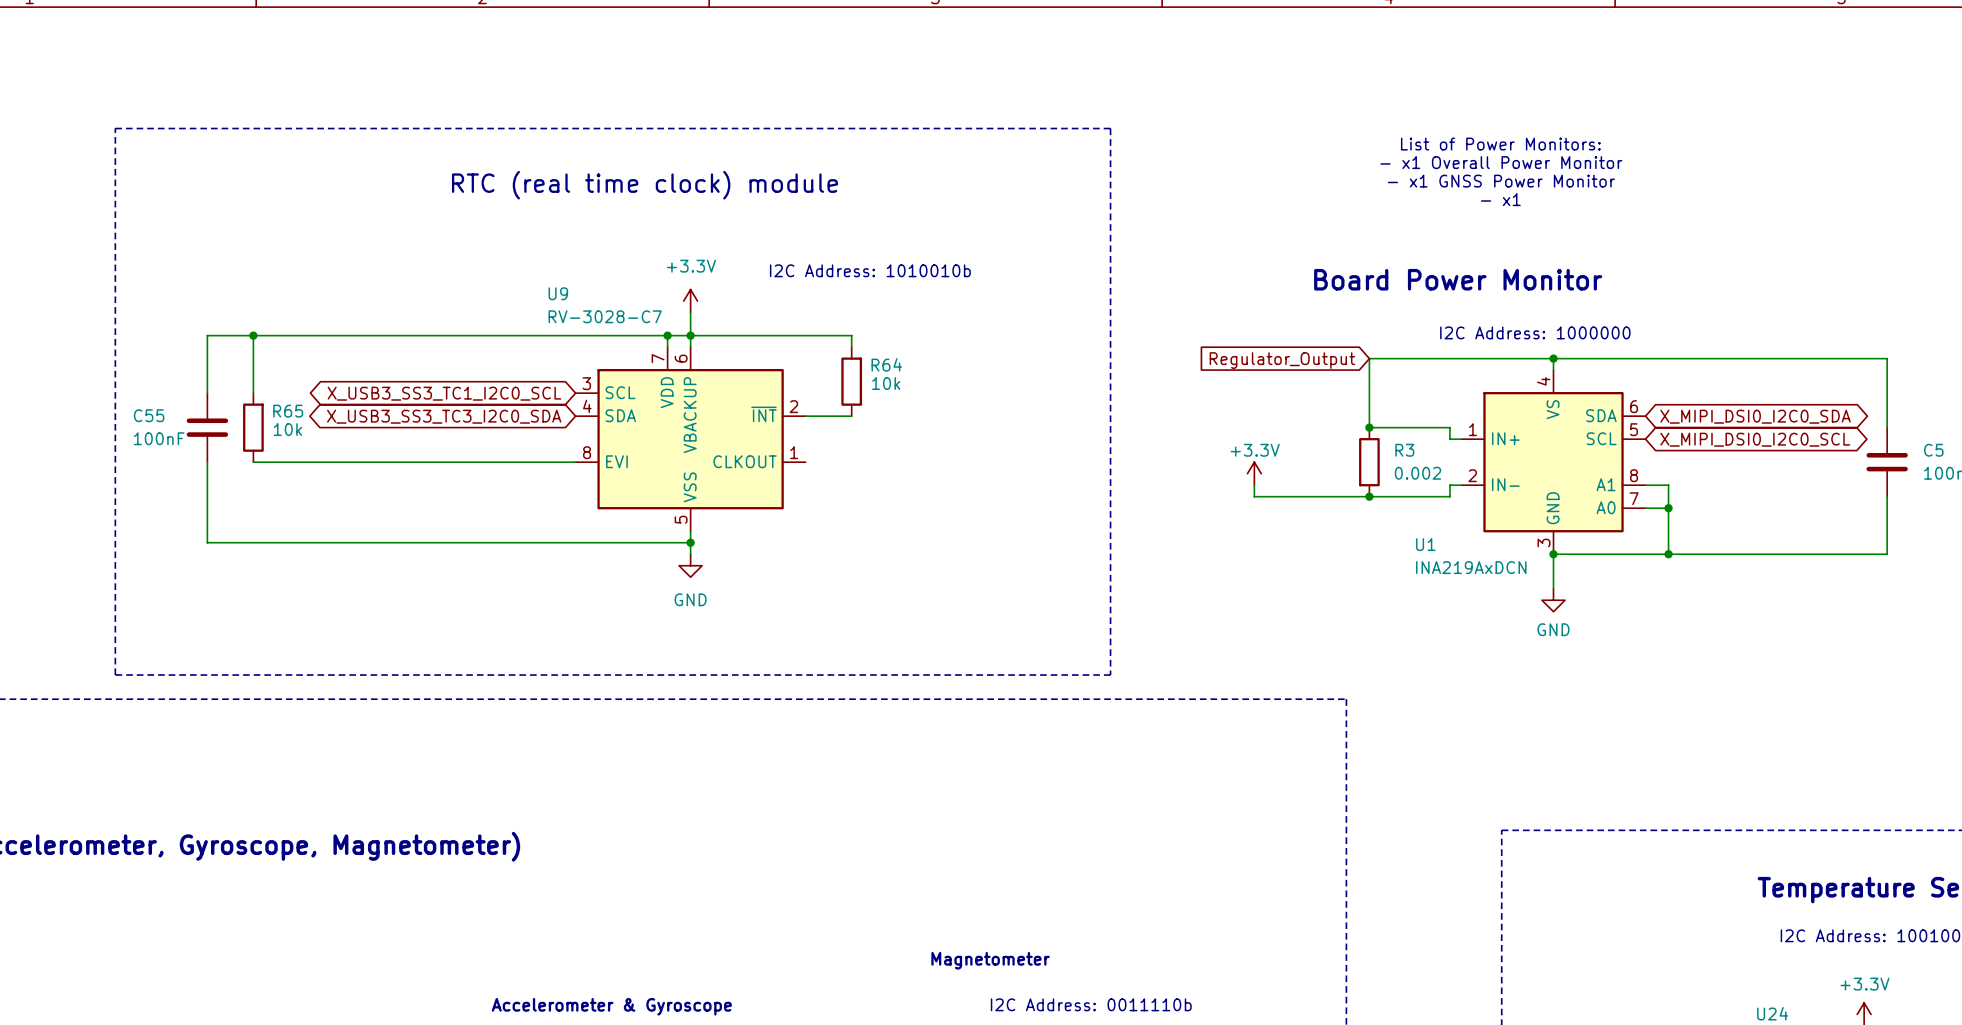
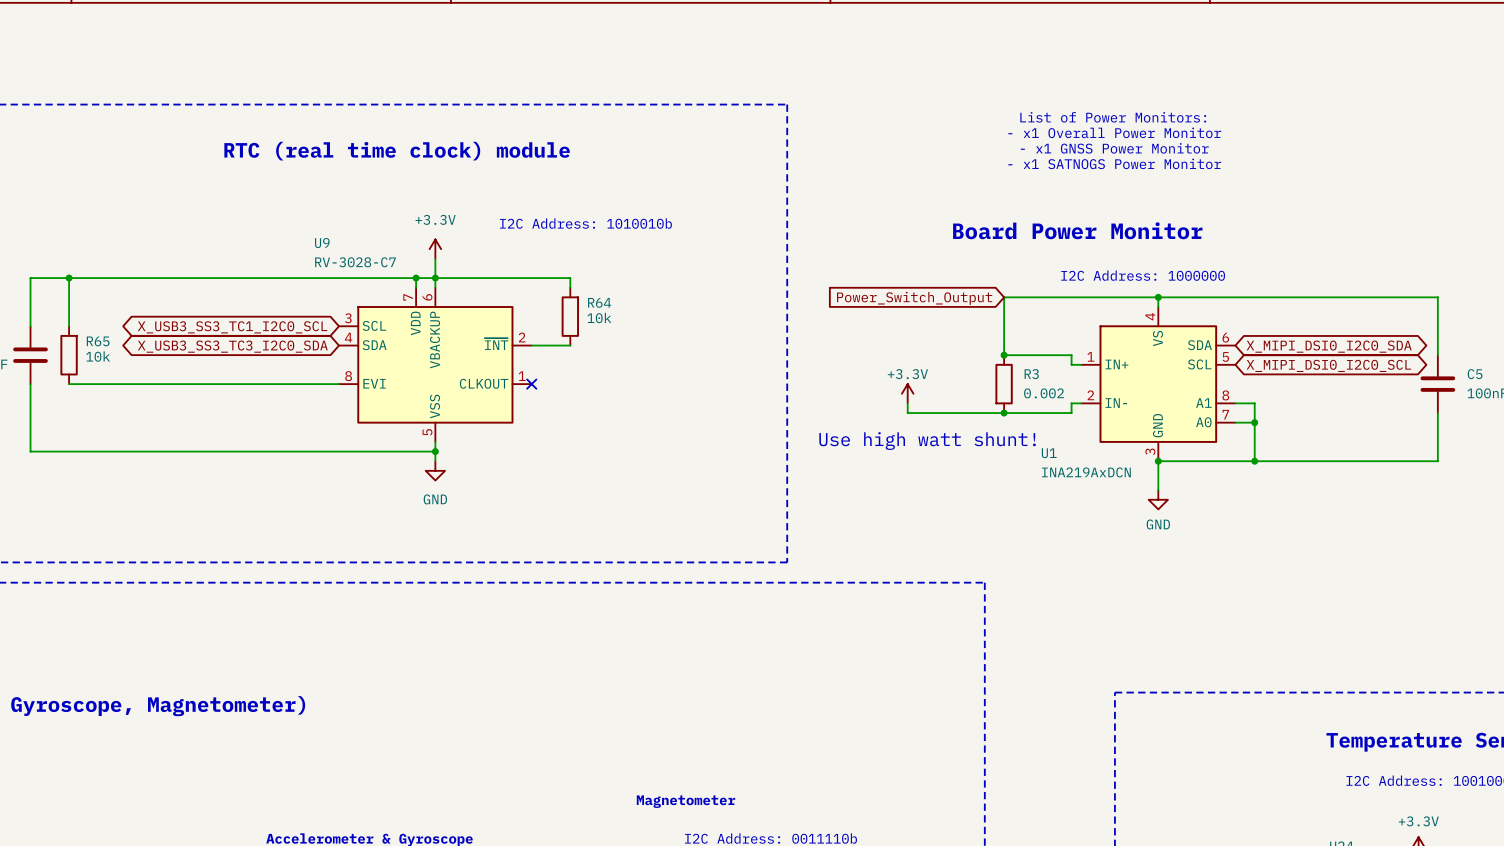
text: - x1 (1500, 199) -> - x1 SATNOGS Power Monitor (1114, 163)
global label: Regulator_Output (1282, 360) -> Power_Switch_Output (914, 298)
no-connect mark: none -> (531, 384)
text: none -> Use high watt shunt! (927, 441)

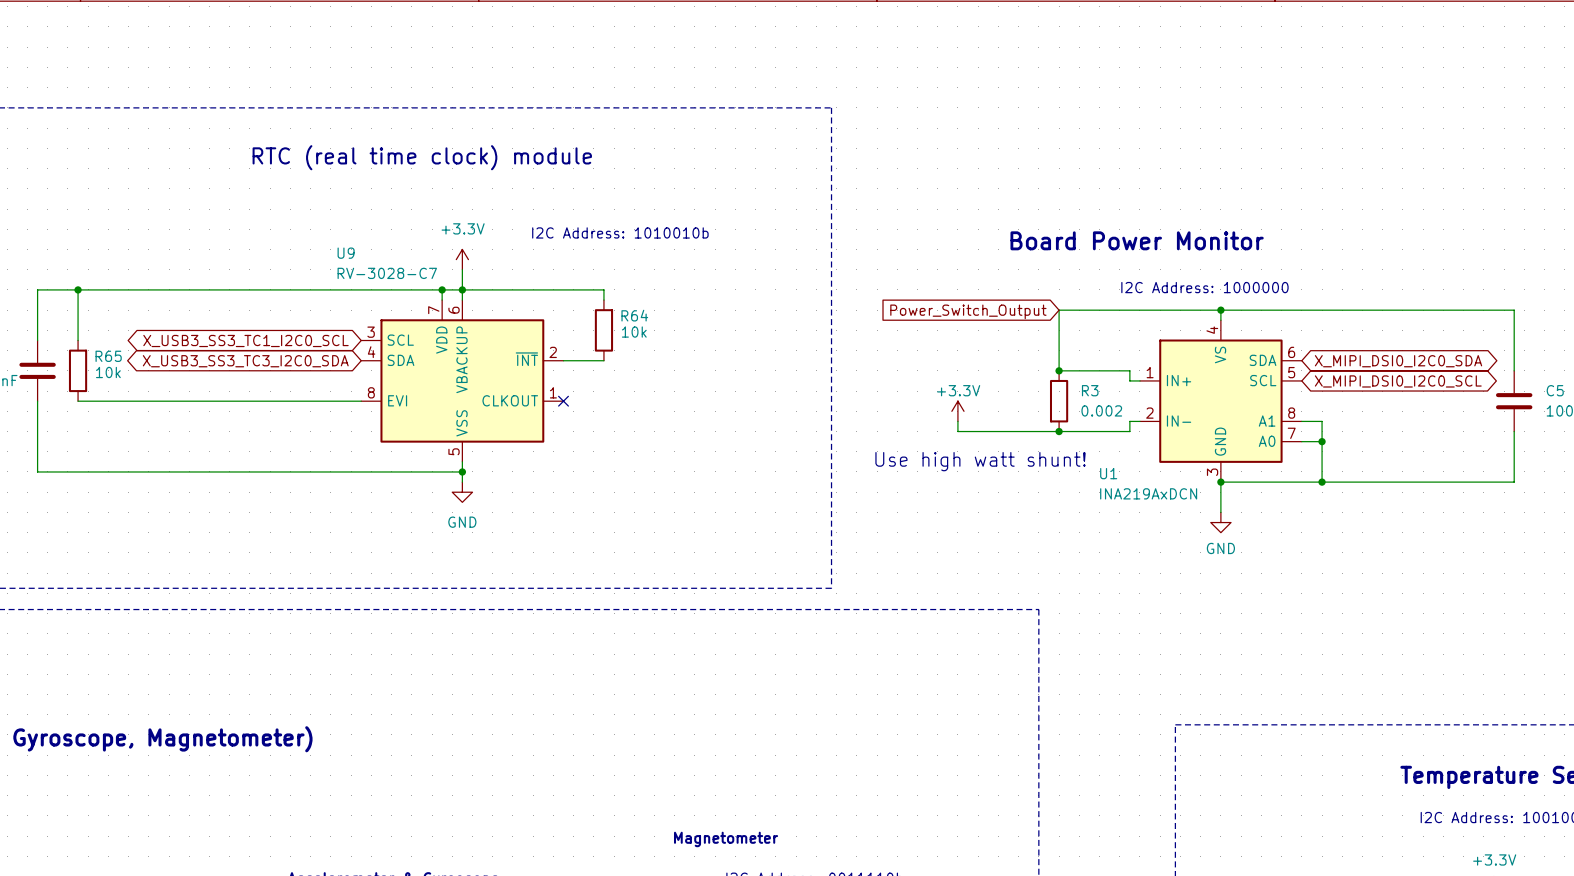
text: List of Power Monitors: (1113, 117) -> none
text: - x1 Overall Power Monitor (1114, 132) -> none
text: - x1 GNSS Power Monitor (1114, 148) -> none
text: - x1 SATNOGS Power Monitor (1114, 163) -> none

